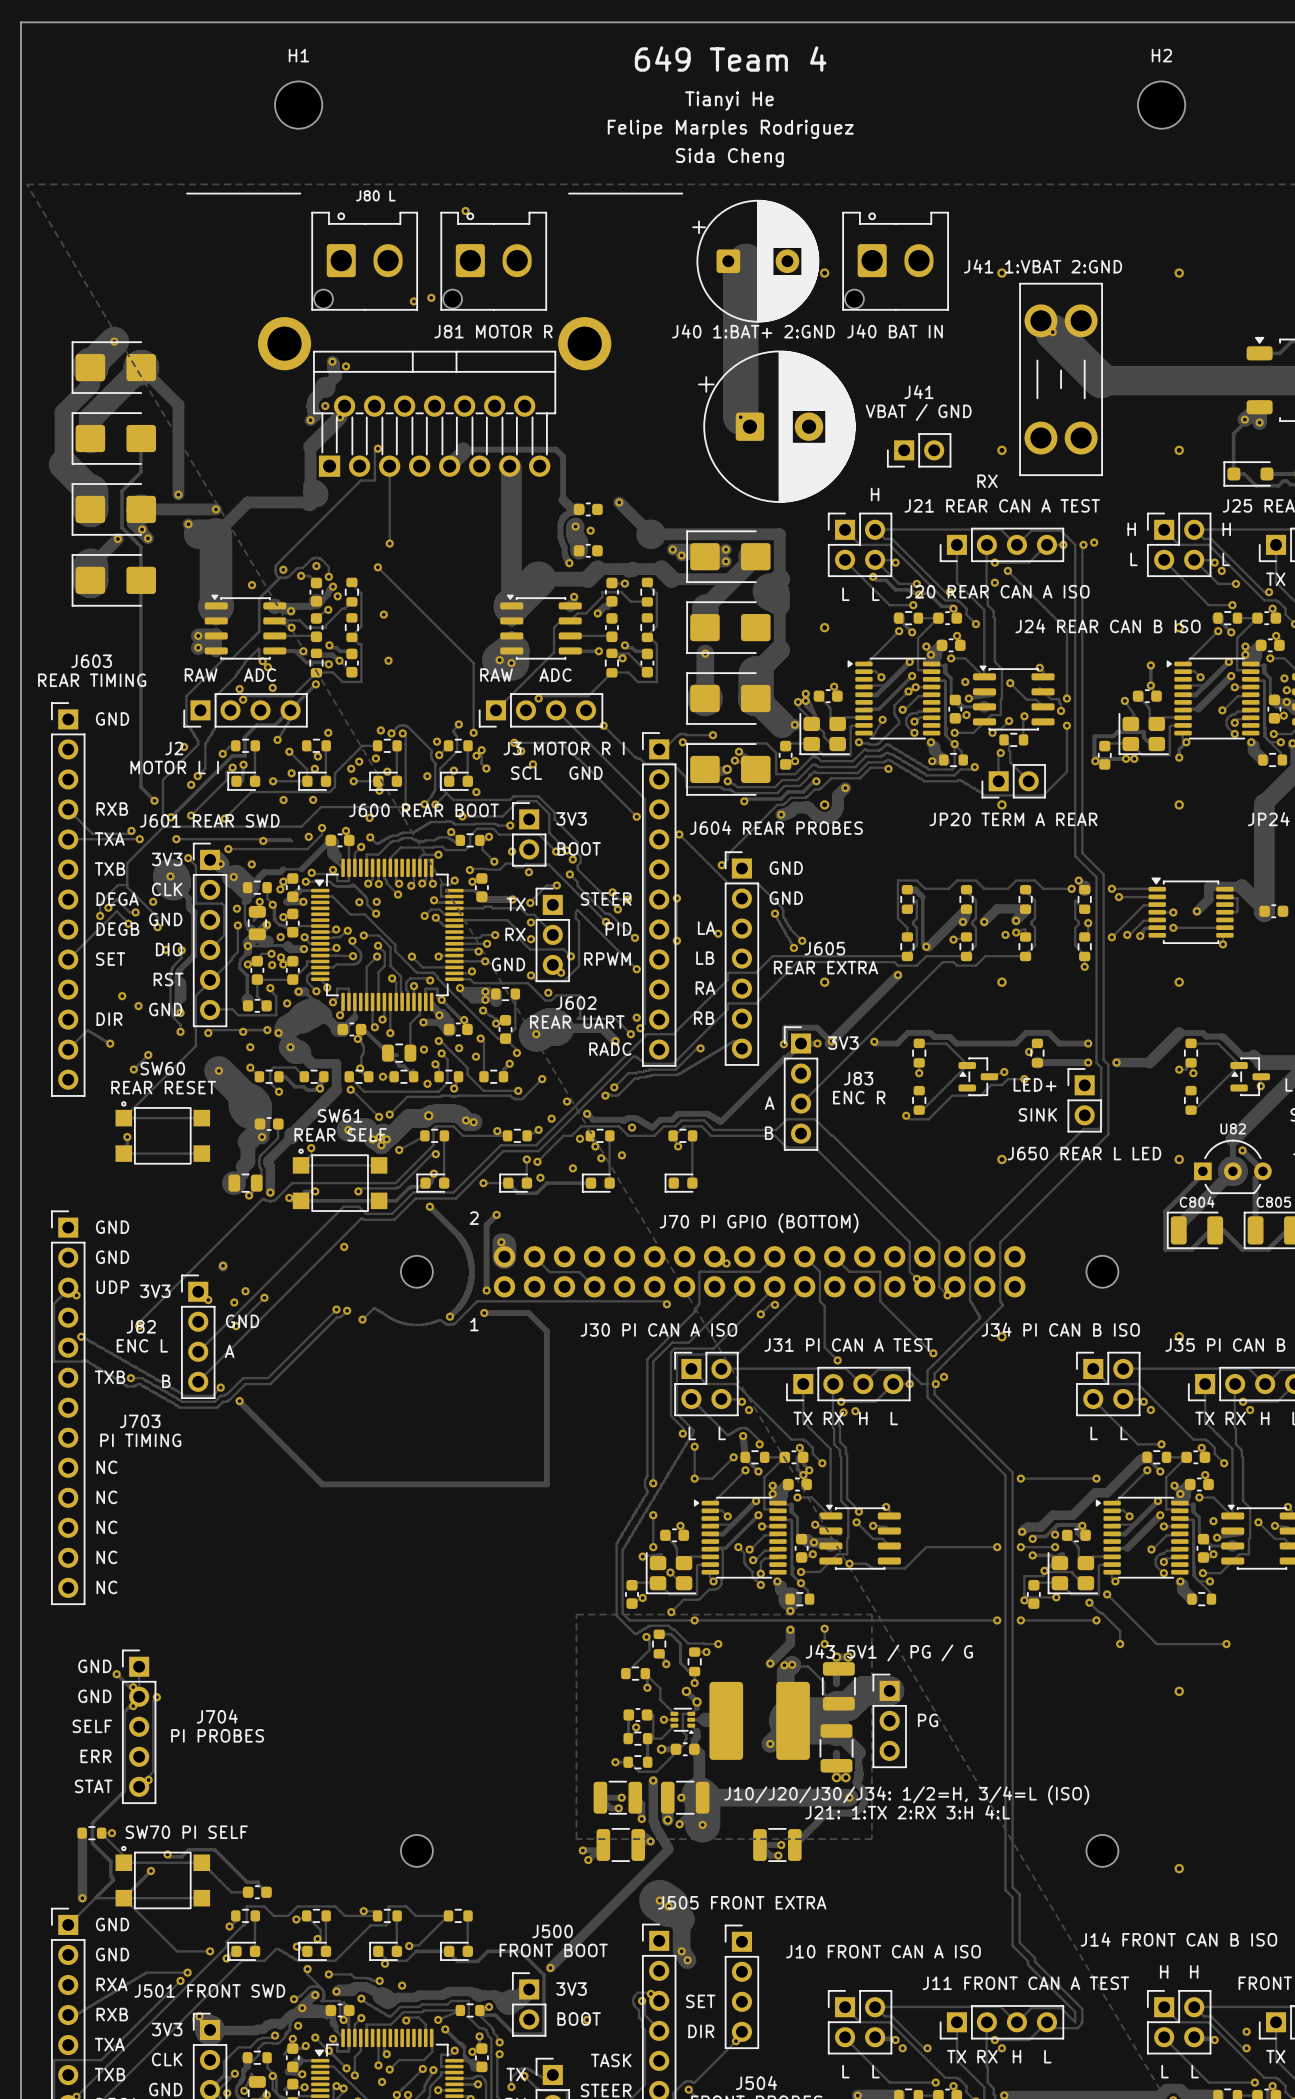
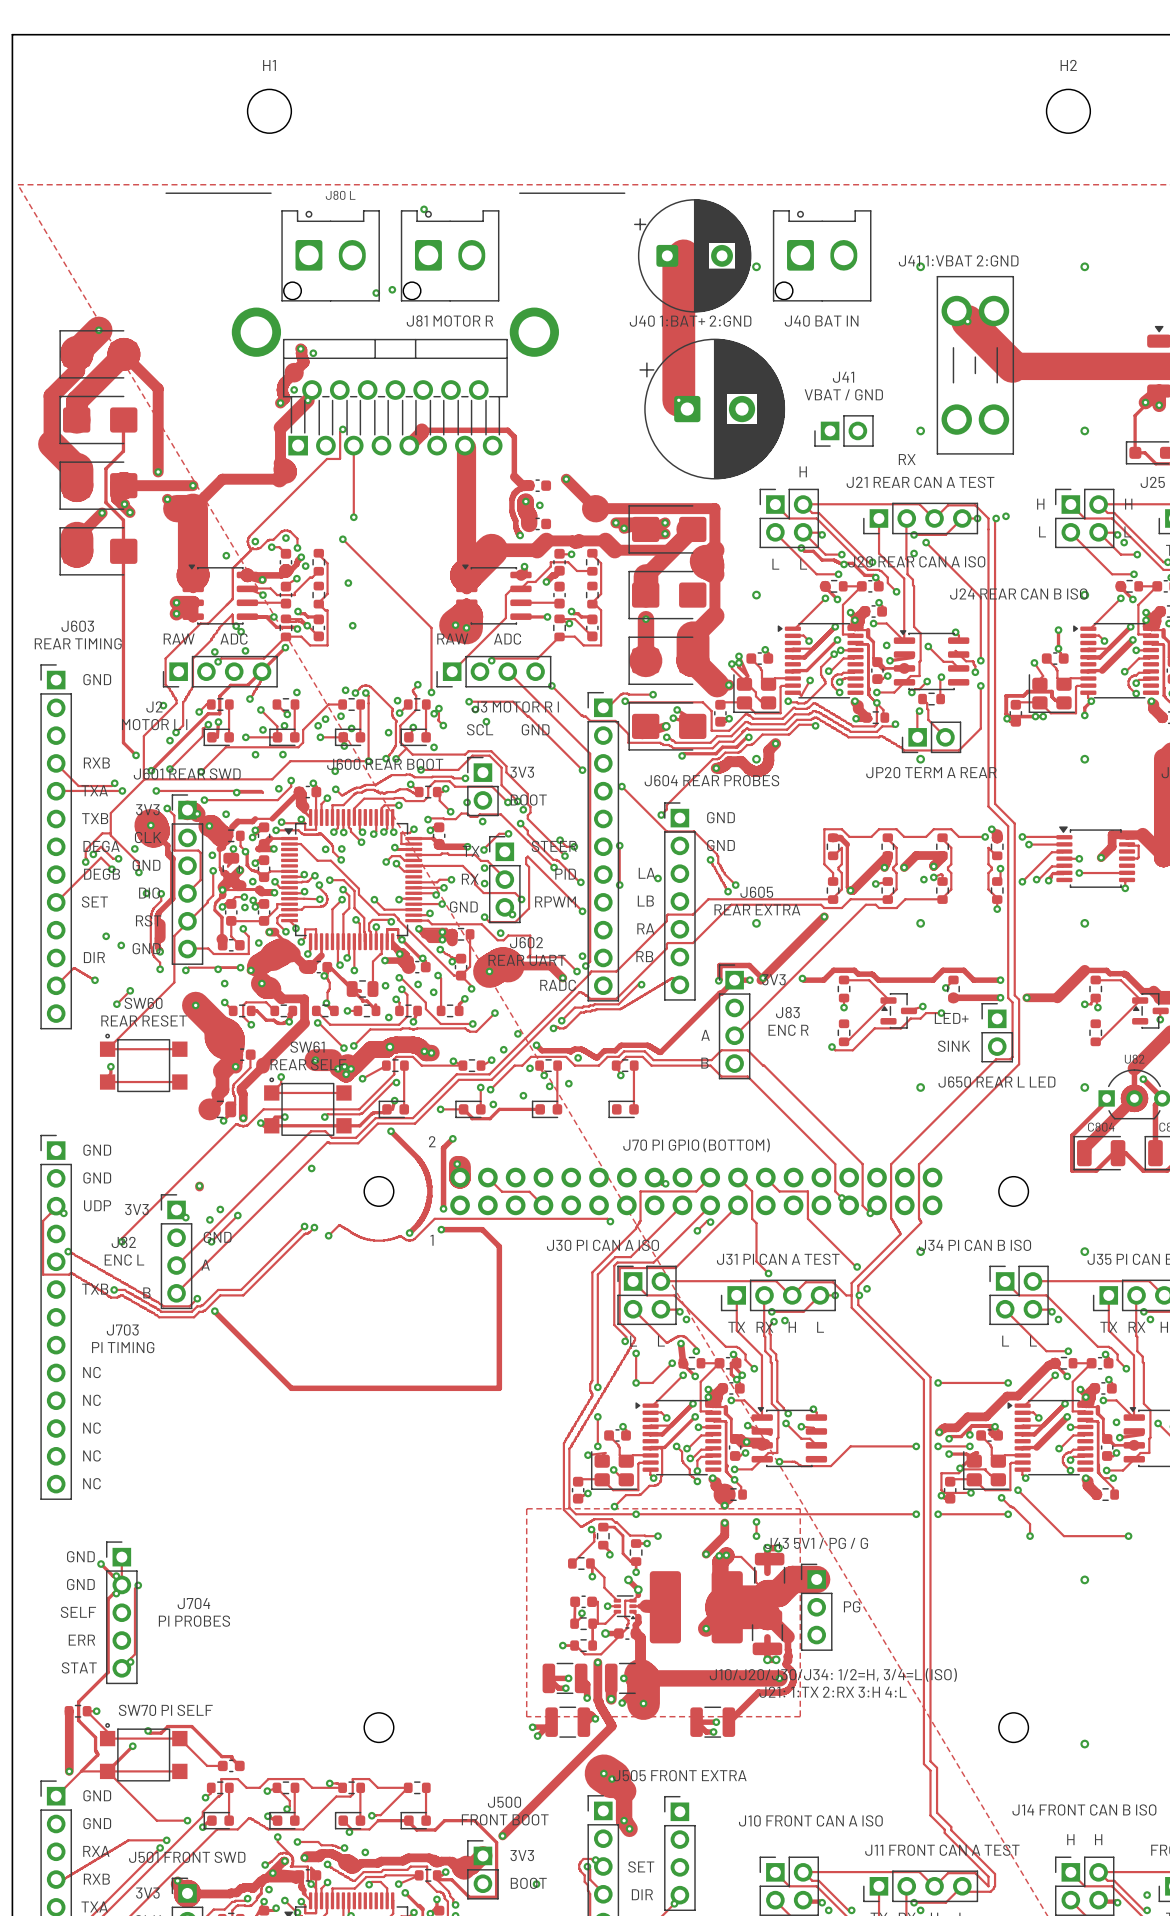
text: 649 Team 4 (730, 59) -> none
text: Tianyi He (729, 100) -> none
text: Felipe Marples Rodriguez (730, 129) -> none
text: Sida Cheng (729, 157) -> none

